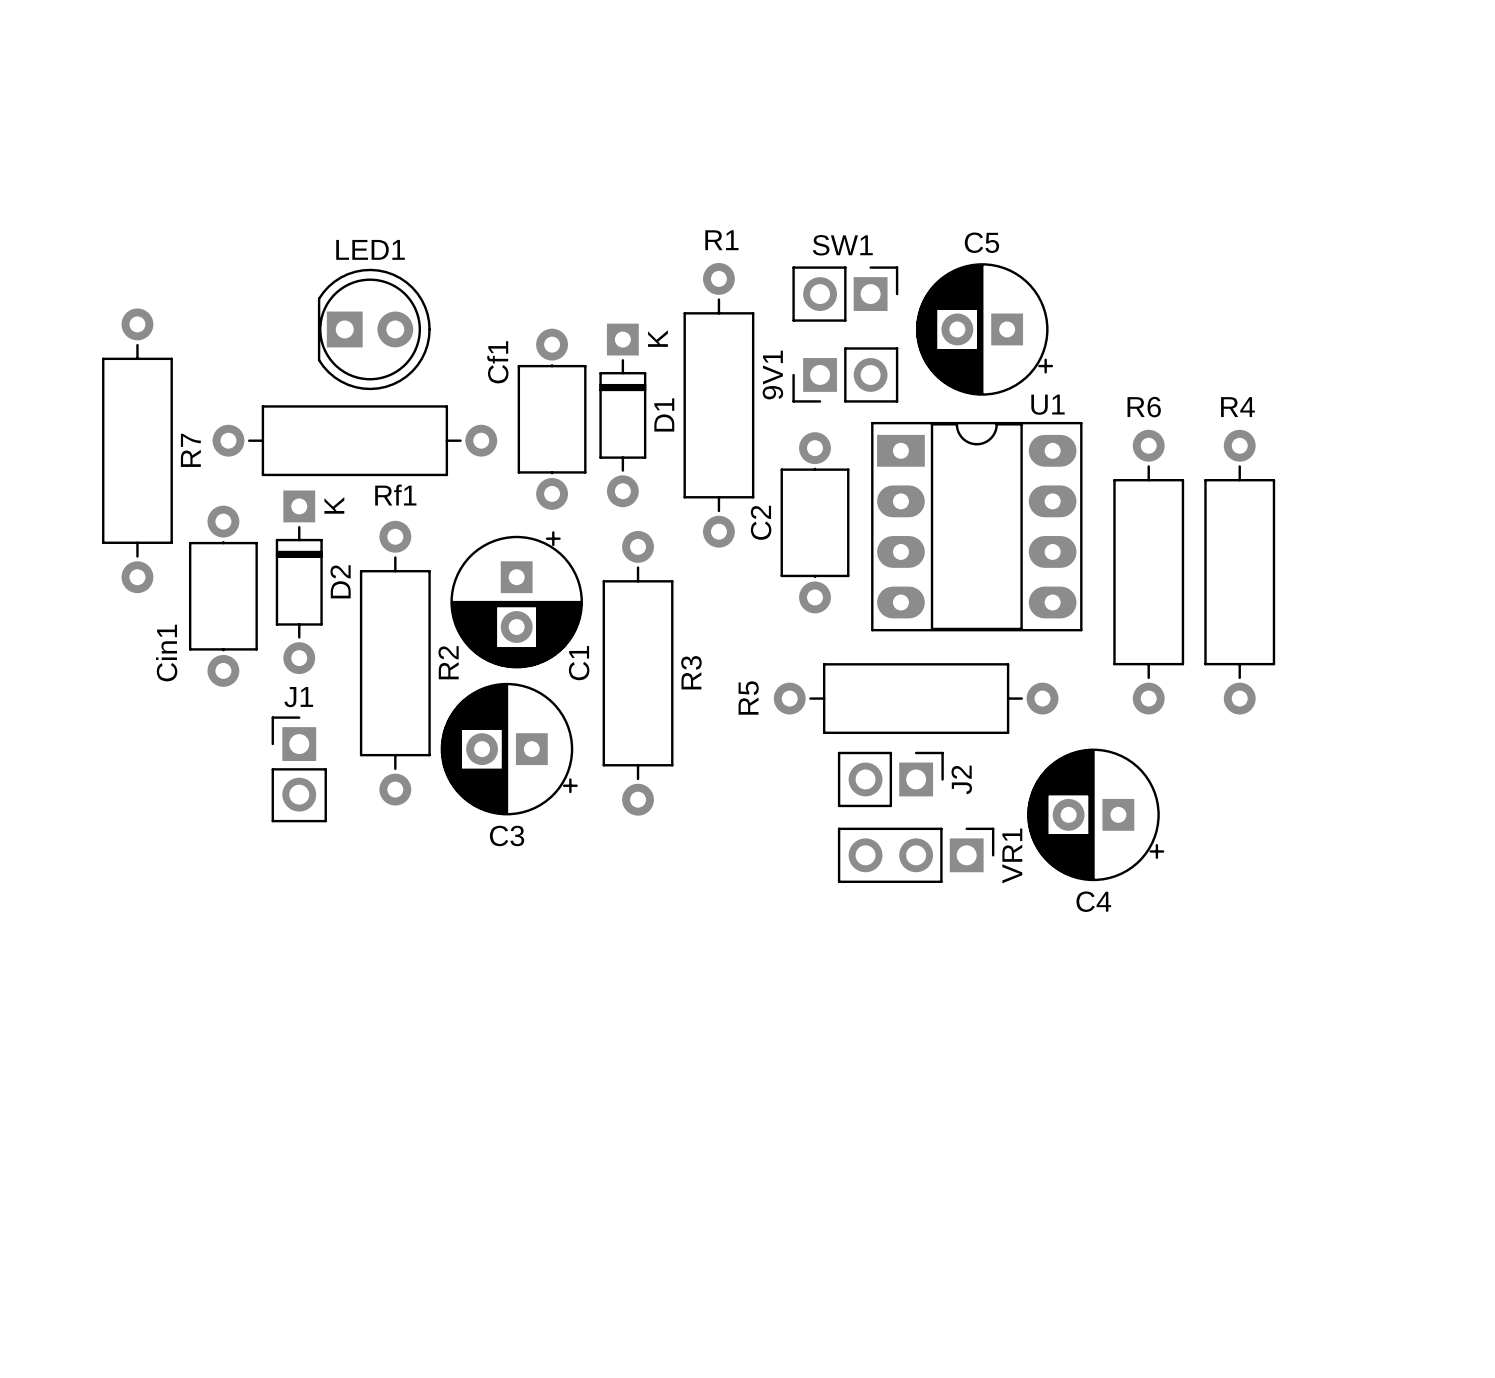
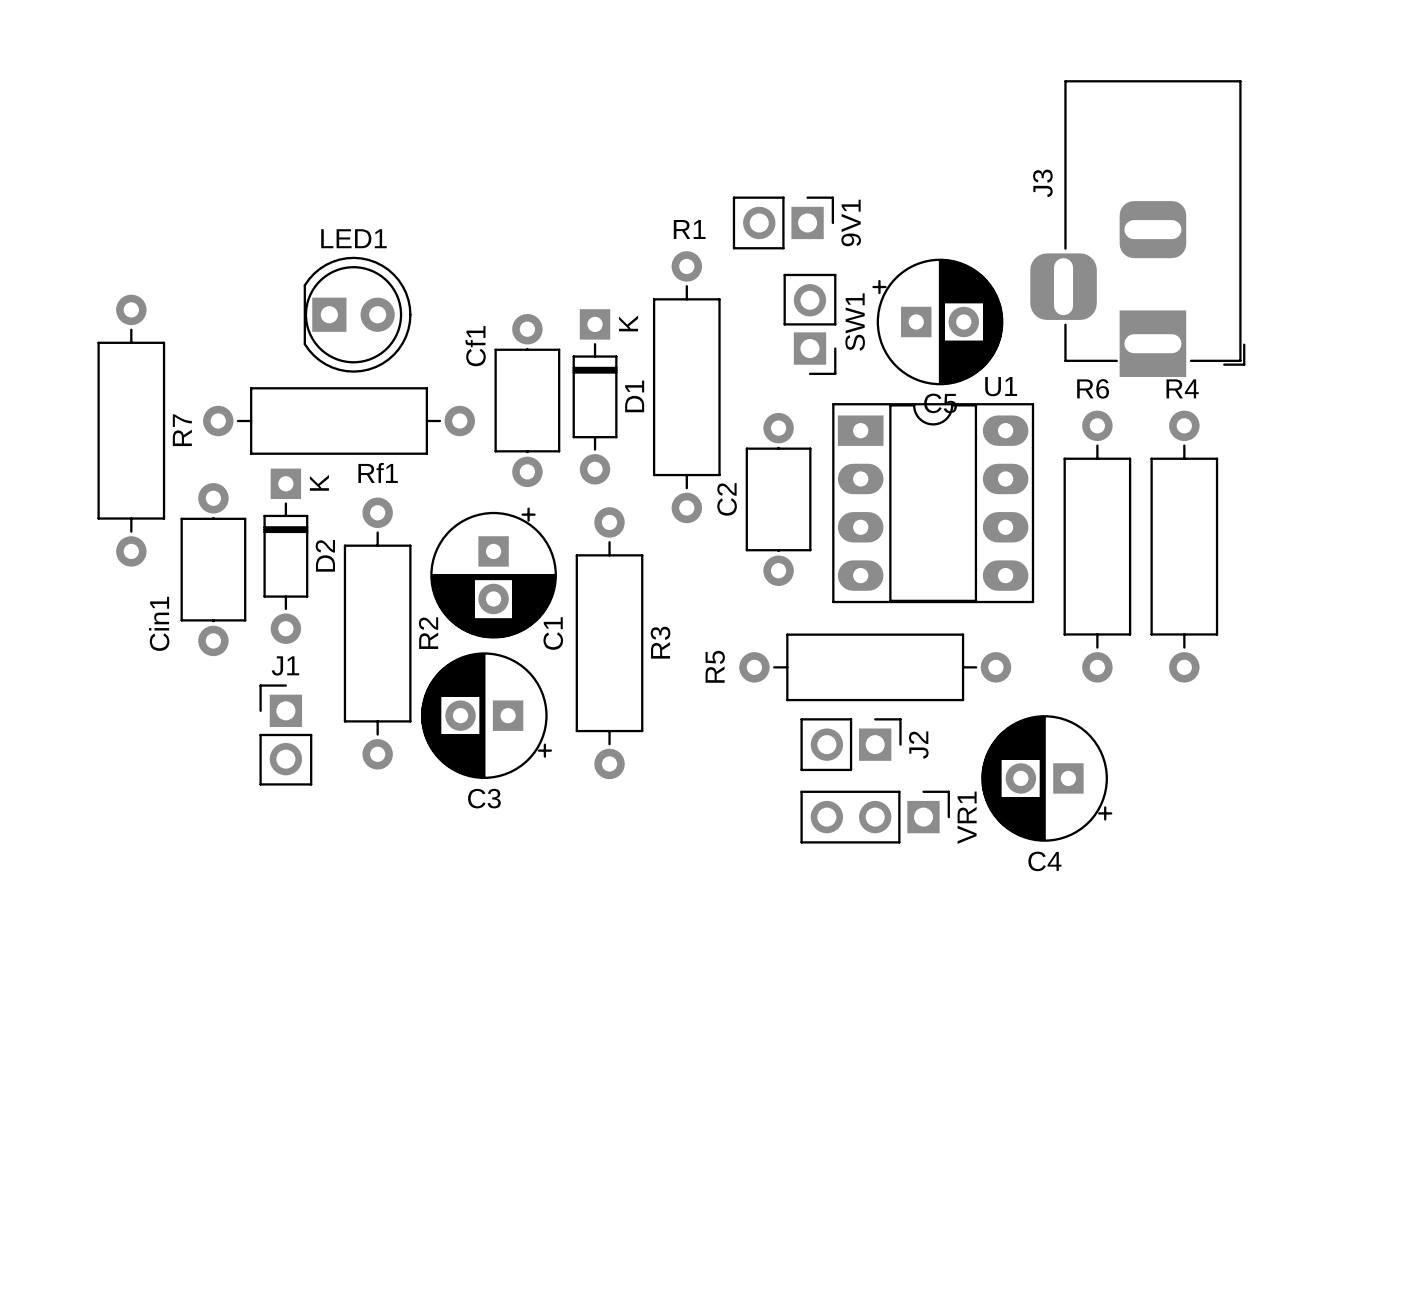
J3: none -> (1137, 228)
SW1 rotation: 0° (845, 294) -> 90° clockwise (809, 324)
C5 rotation: 0° (984, 329) -> 180° (937, 321)
9V1 rotation: 0° (845, 374) -> 180° (783, 222)
9V1 position: (845, 374) -> (783, 222)

